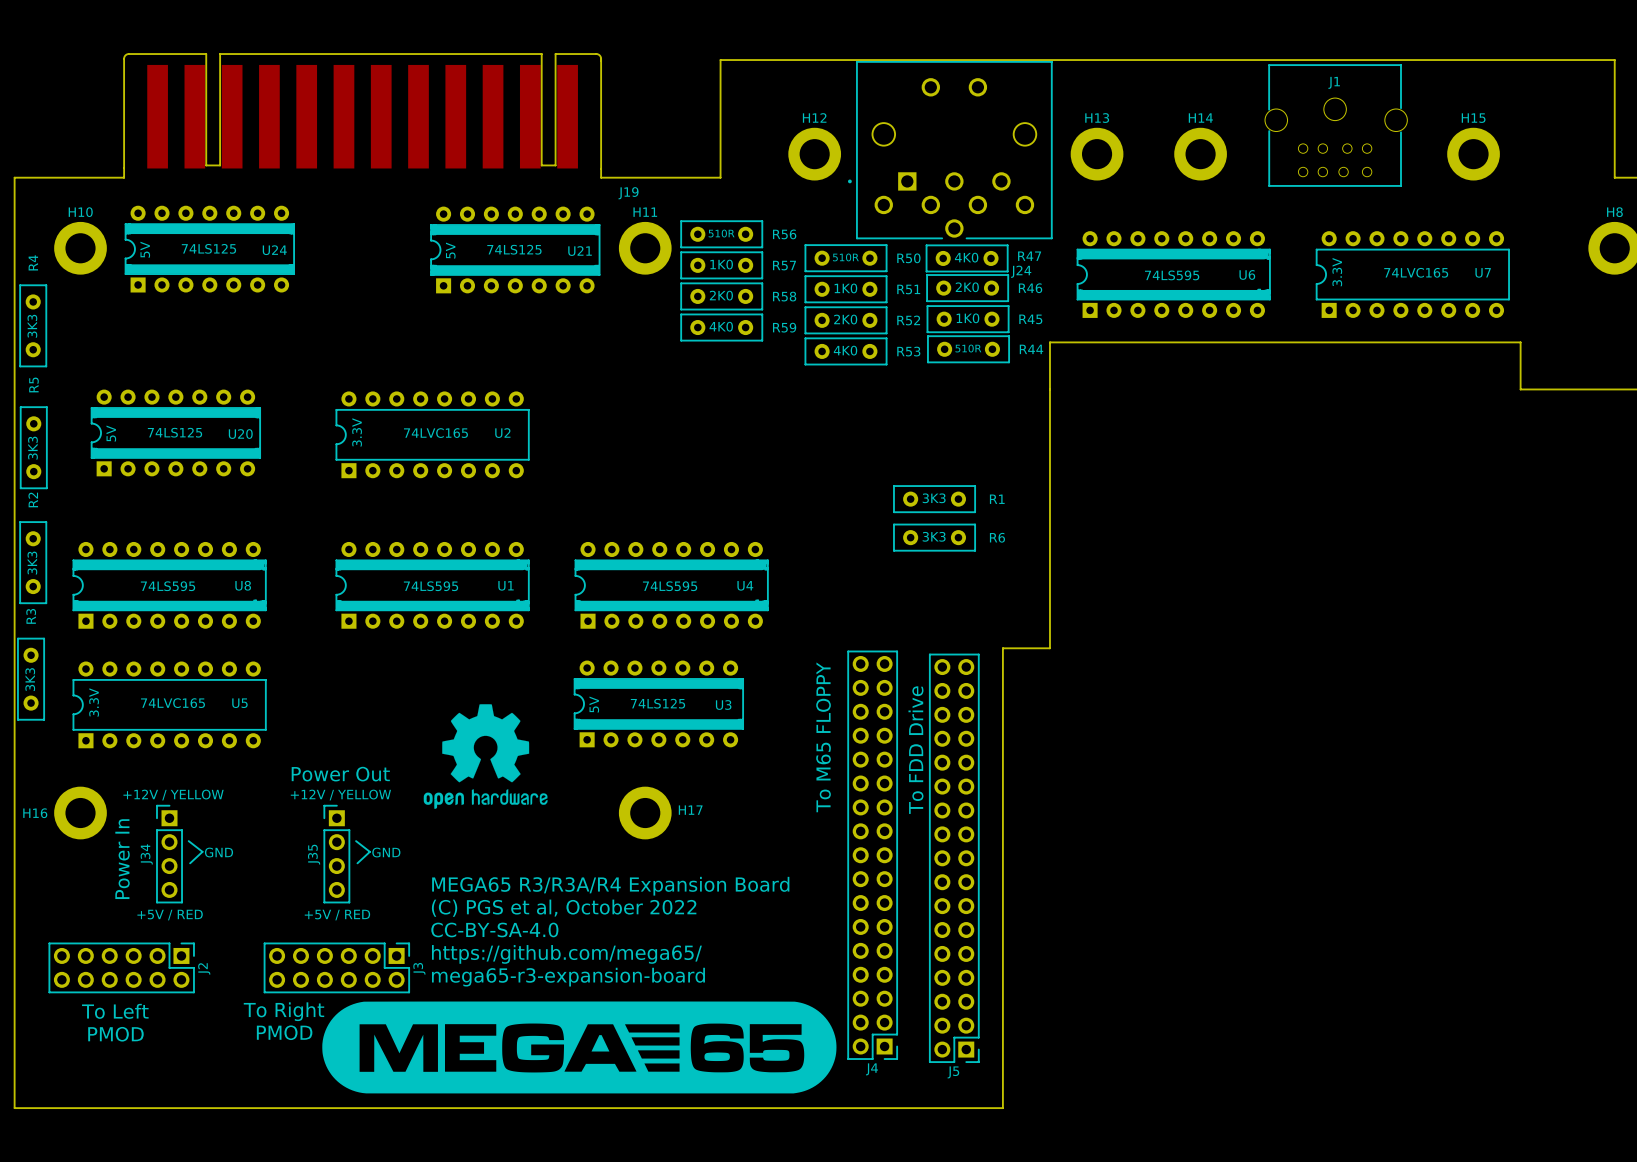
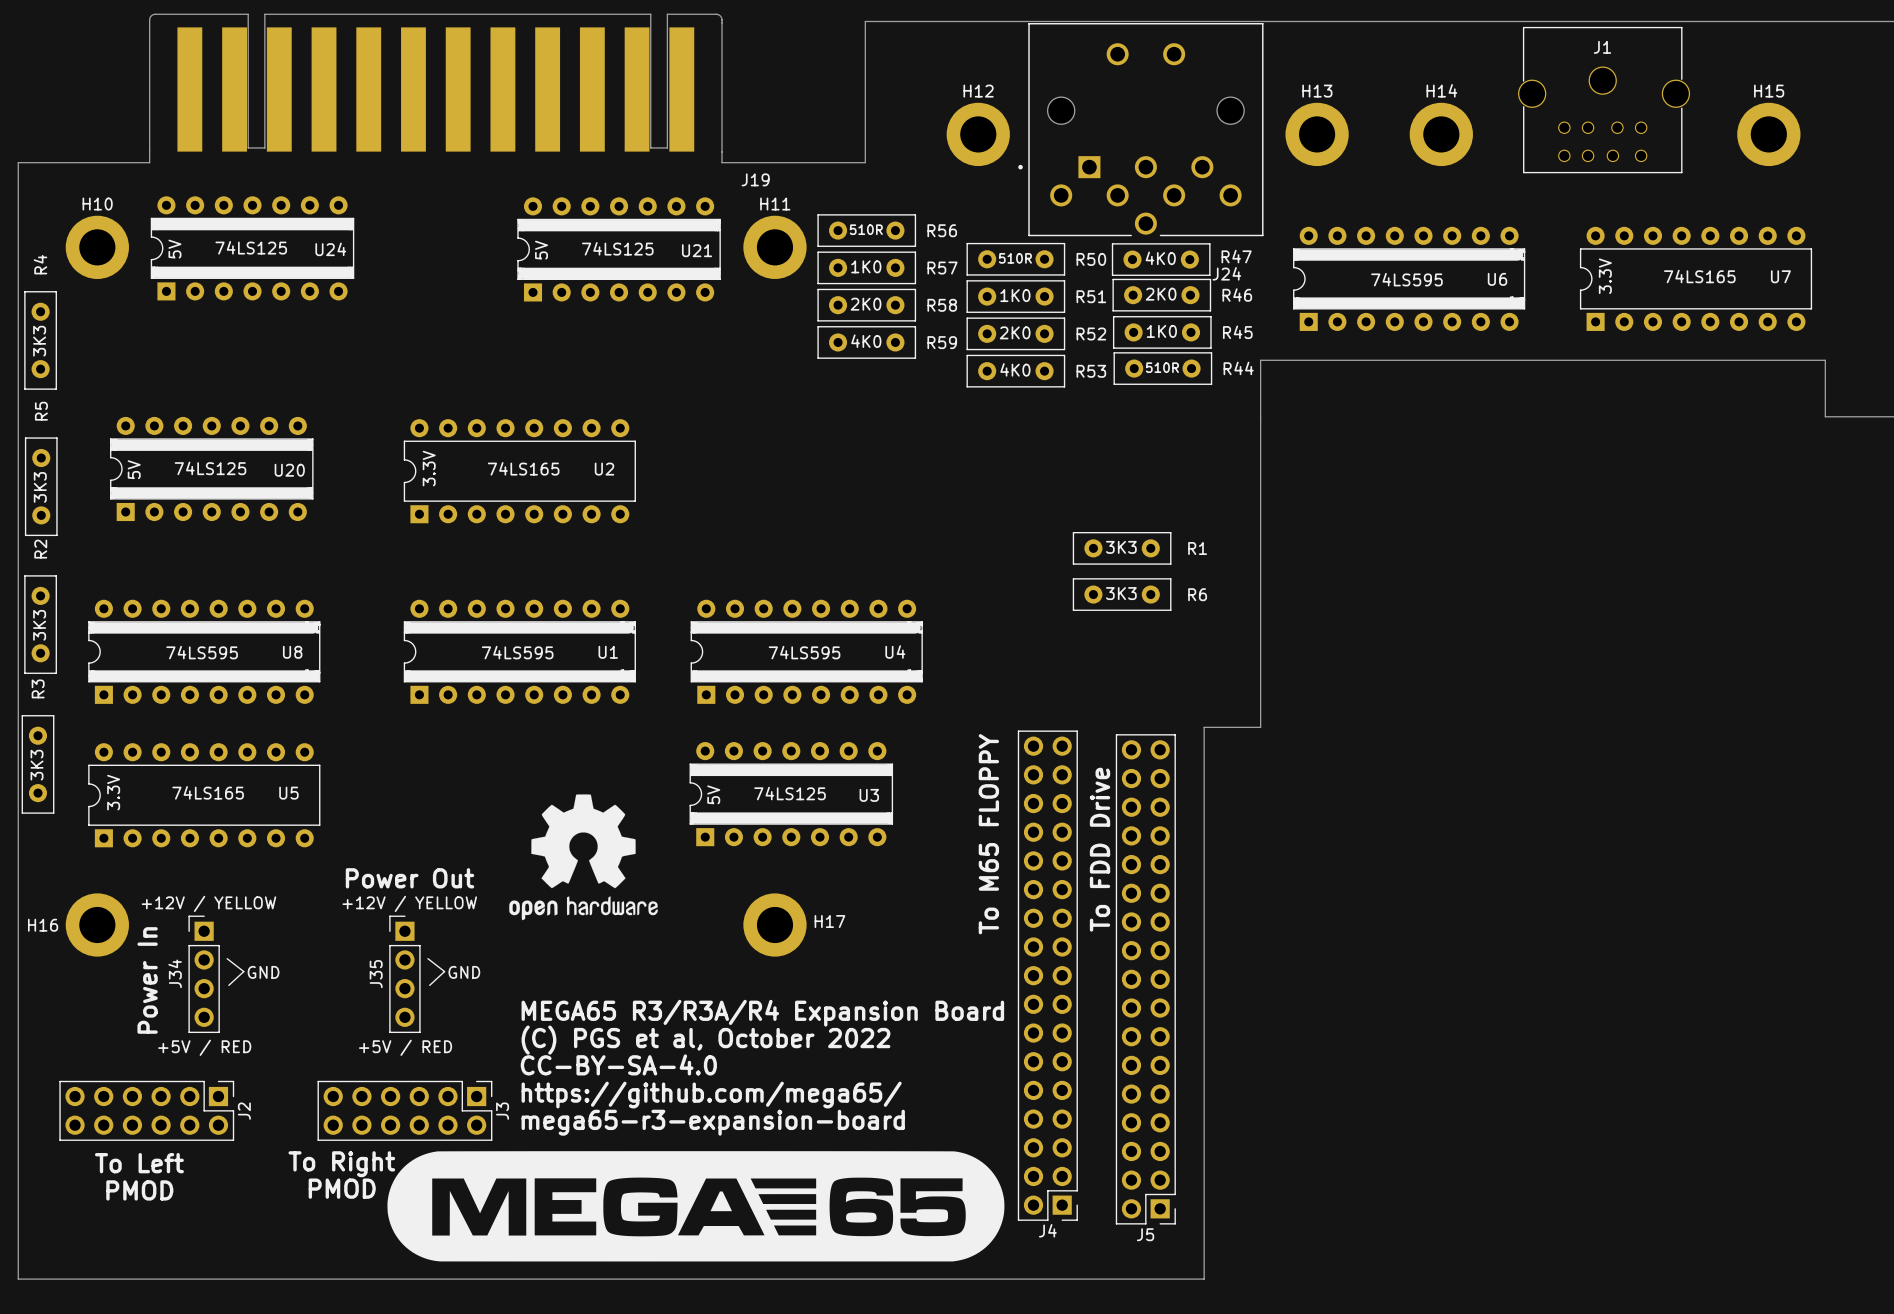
U7 value: 74LVC165 (1416, 272) -> 74LS165 (1699, 276)
U2 value: 74LVC165 (435, 433) -> 74LS165 (523, 468)
U5 value: 74LVC165 (173, 703) -> 74LS165 (208, 792)

